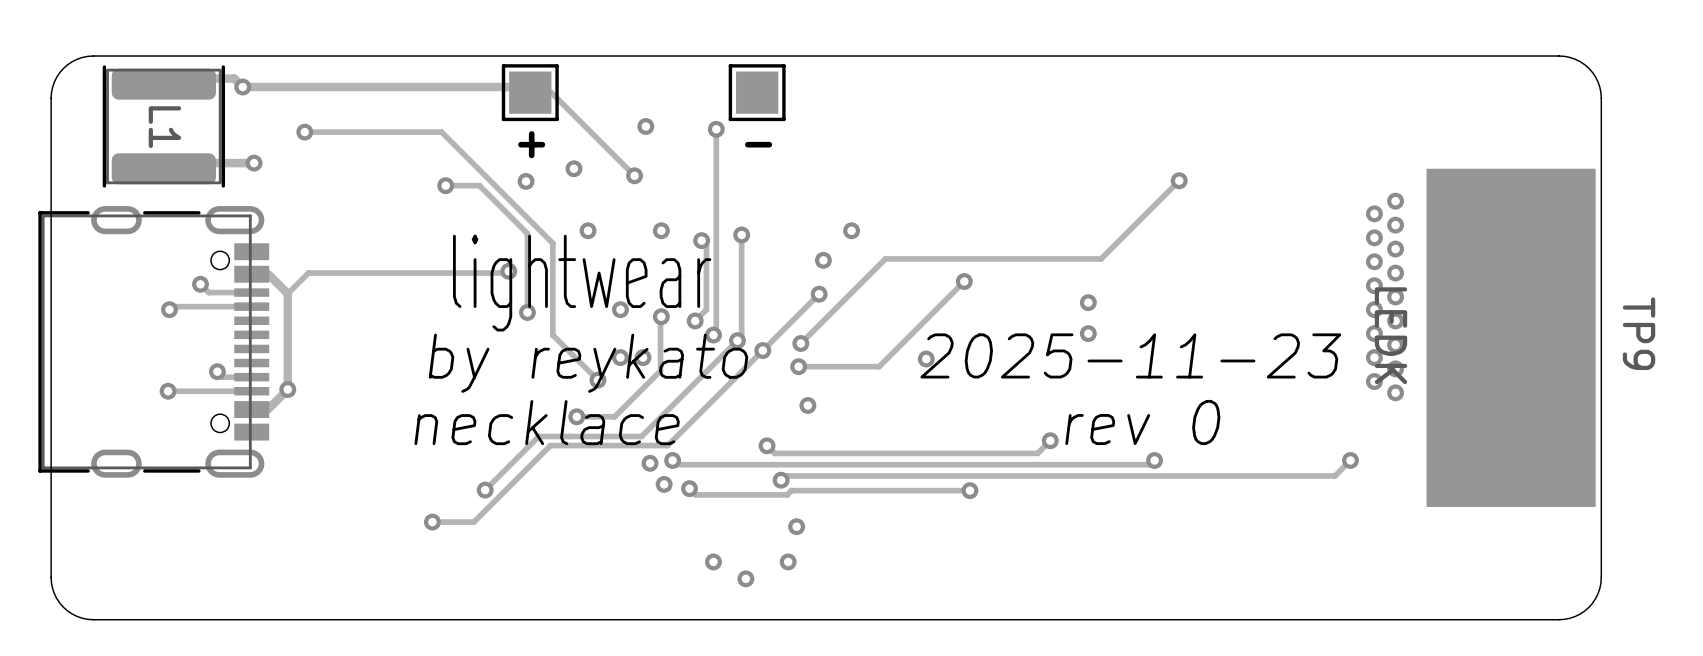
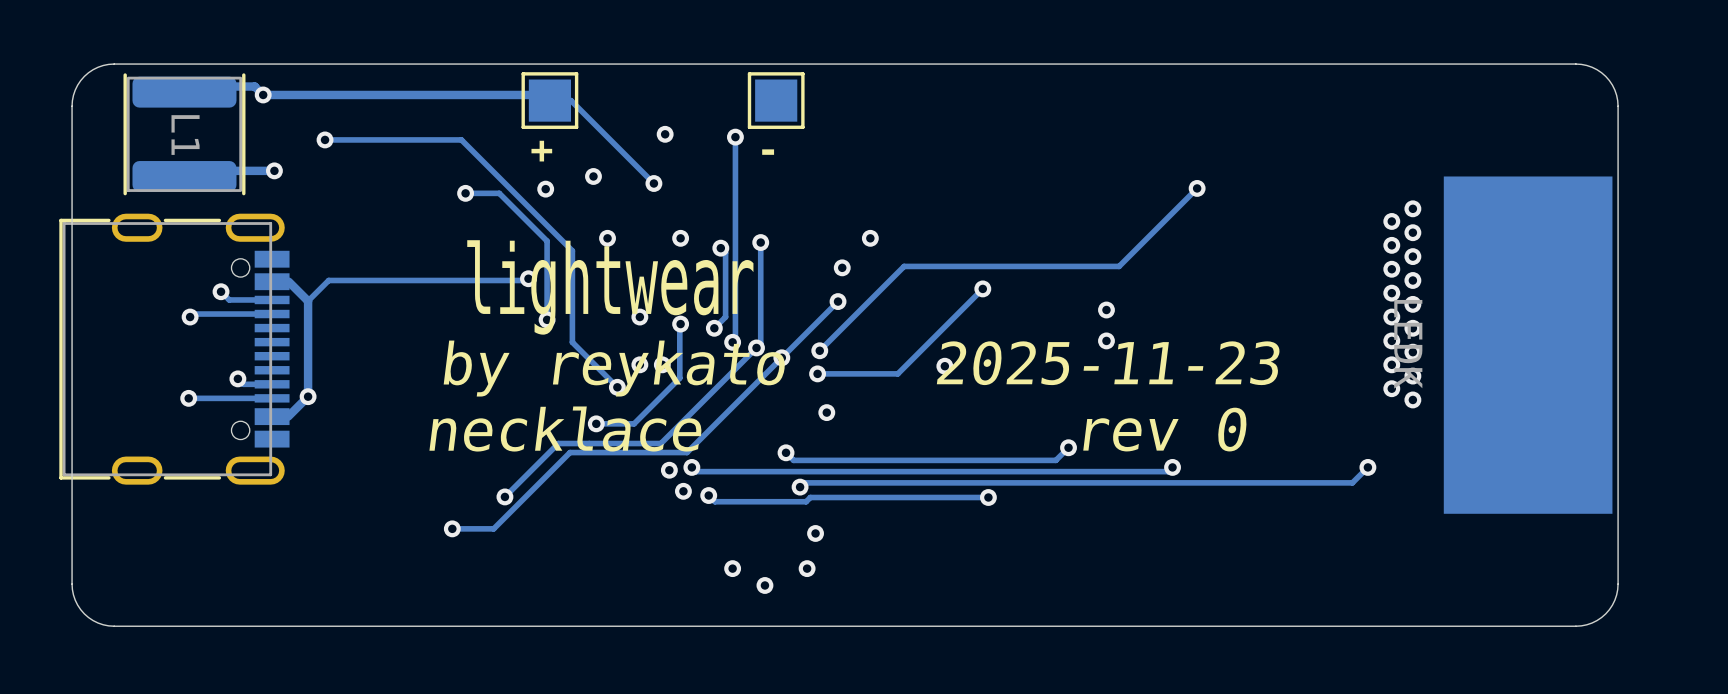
TP9 name: TP9 (1639, 333) -> none

